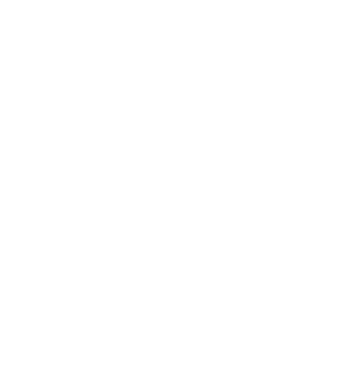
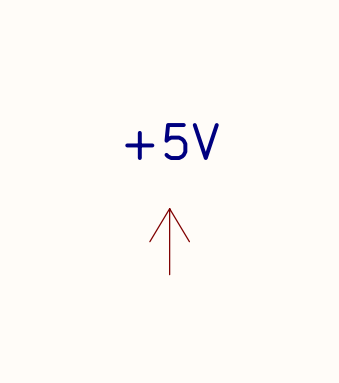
power symbol: none -> +5V (169, 241)

